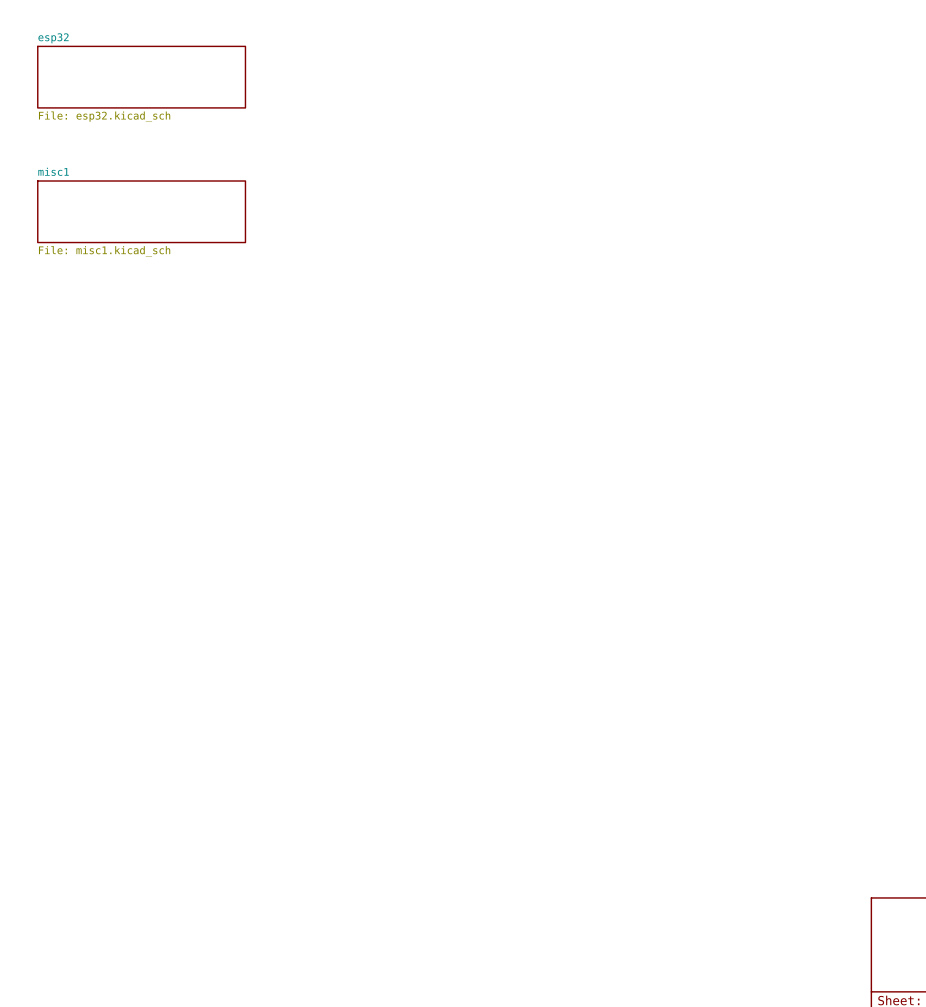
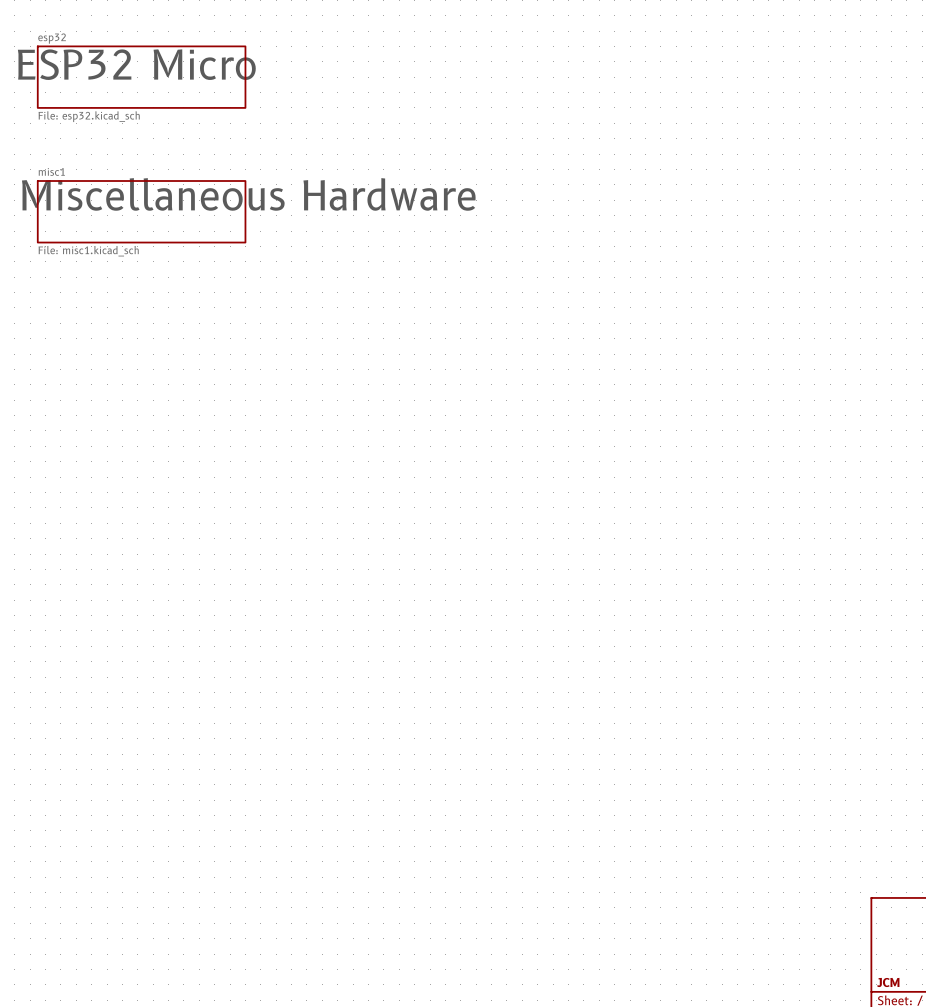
text: none -> ESP32 Micro (136, 64)
text: none -> Miscellaneous Hardware (248, 194)
title block: none -> JCM (888, 982)

